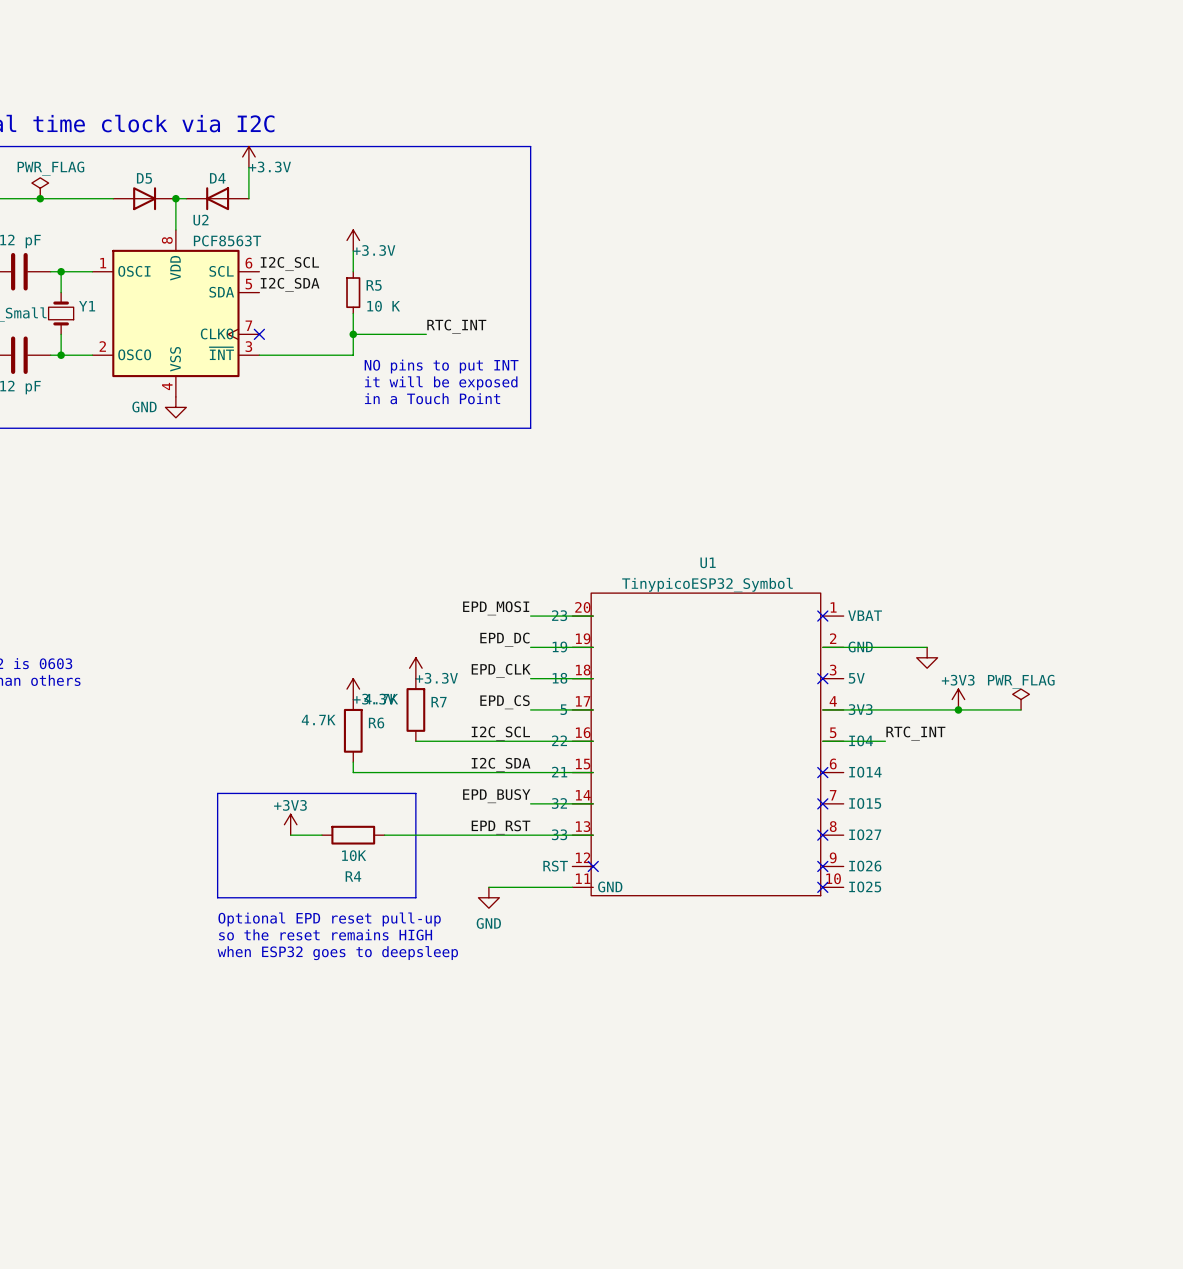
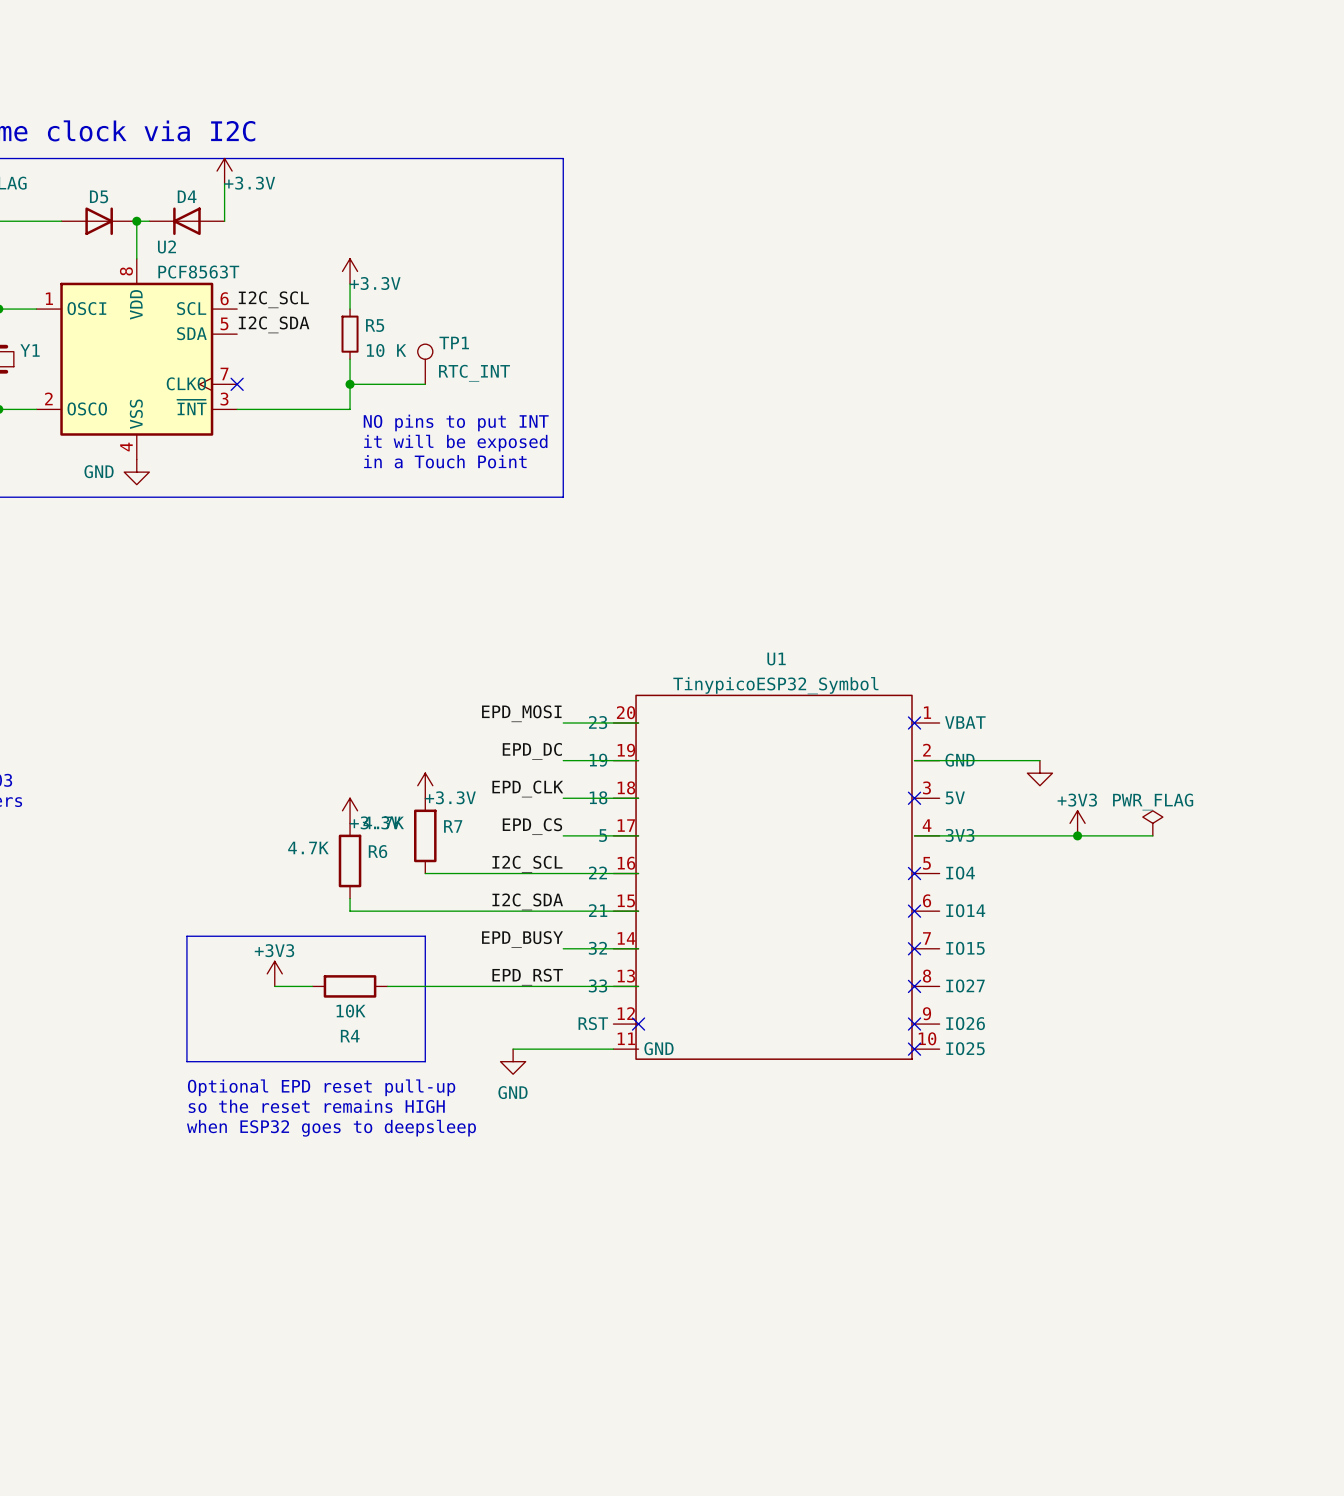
TP1: none -> RTC_INT (425, 364)
label: RTC_INT (456, 326) -> none
wire: (415, 334) (426, 334) -> none
label: RTC_INT (915, 733) -> none
wire: (822, 741) (885, 741) -> none
no-connect mark: none -> (914, 873)

